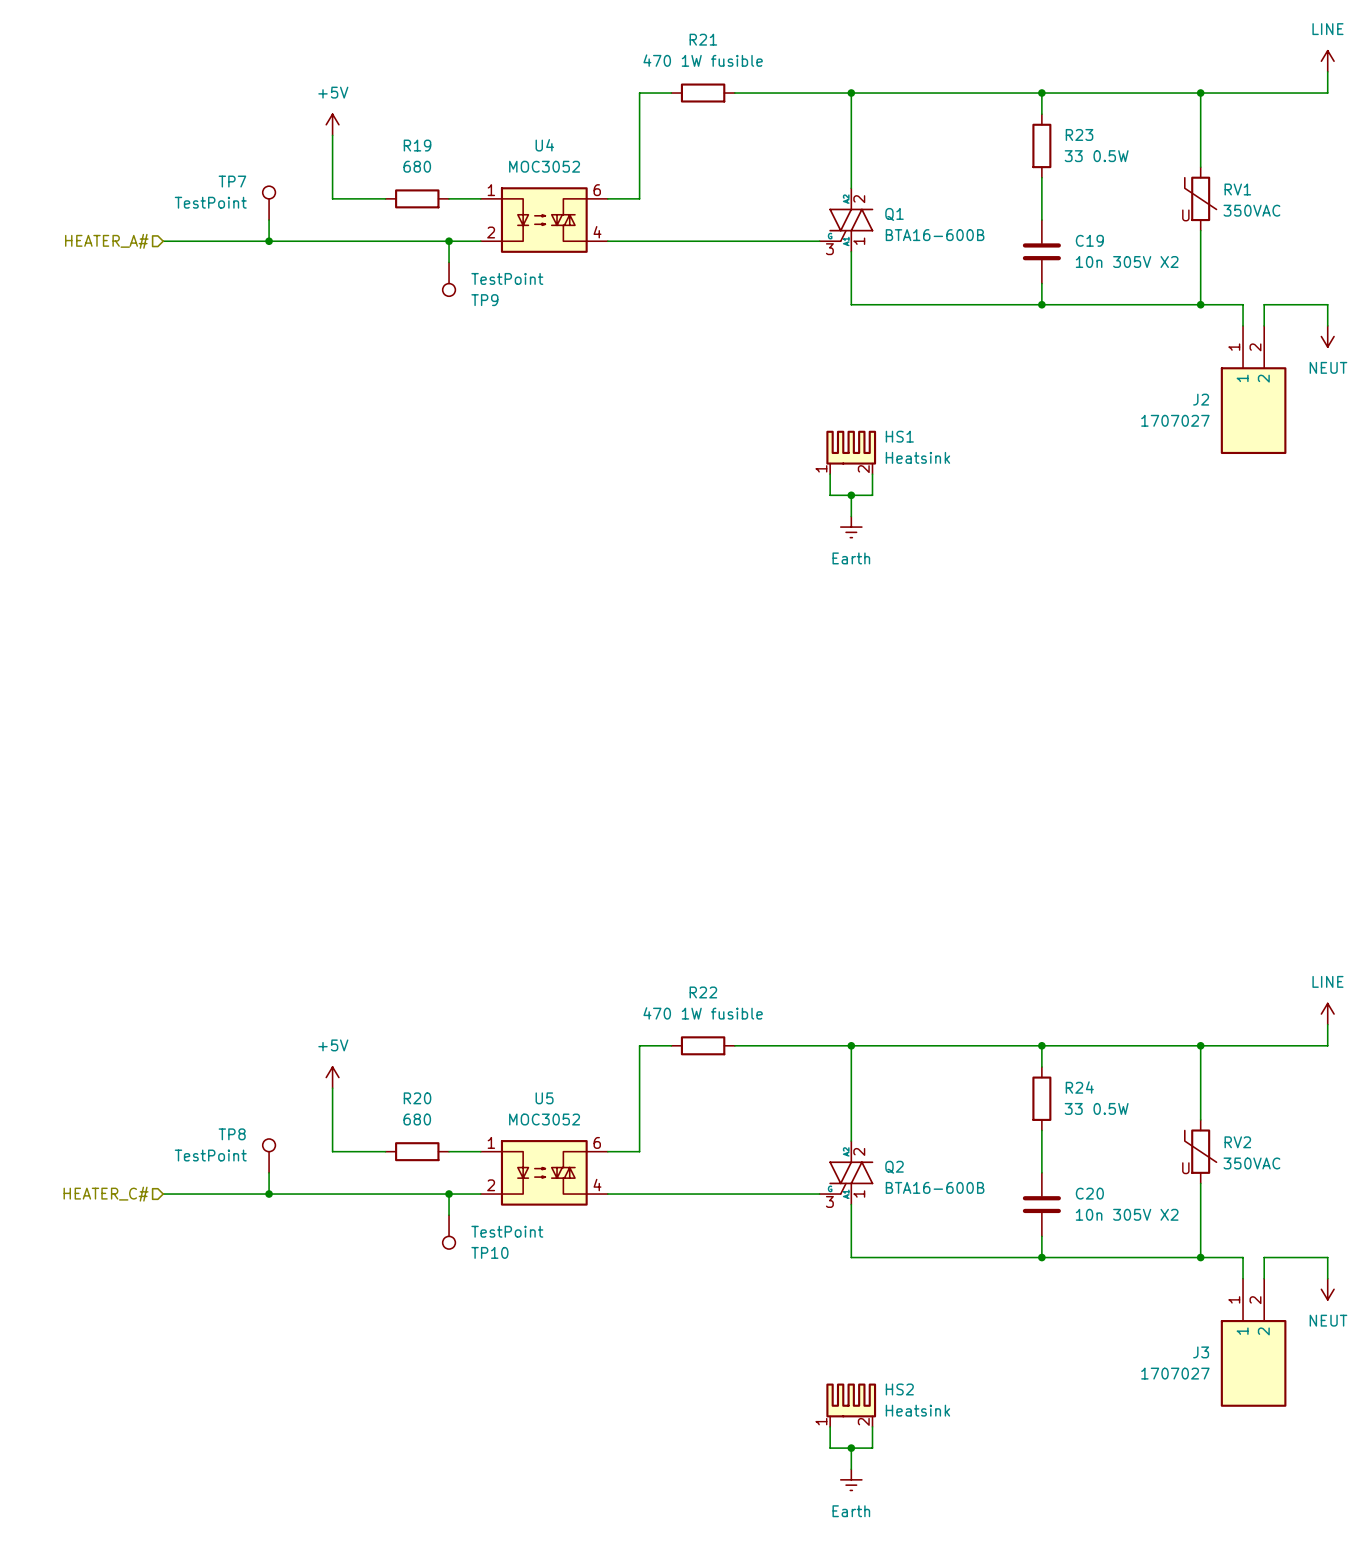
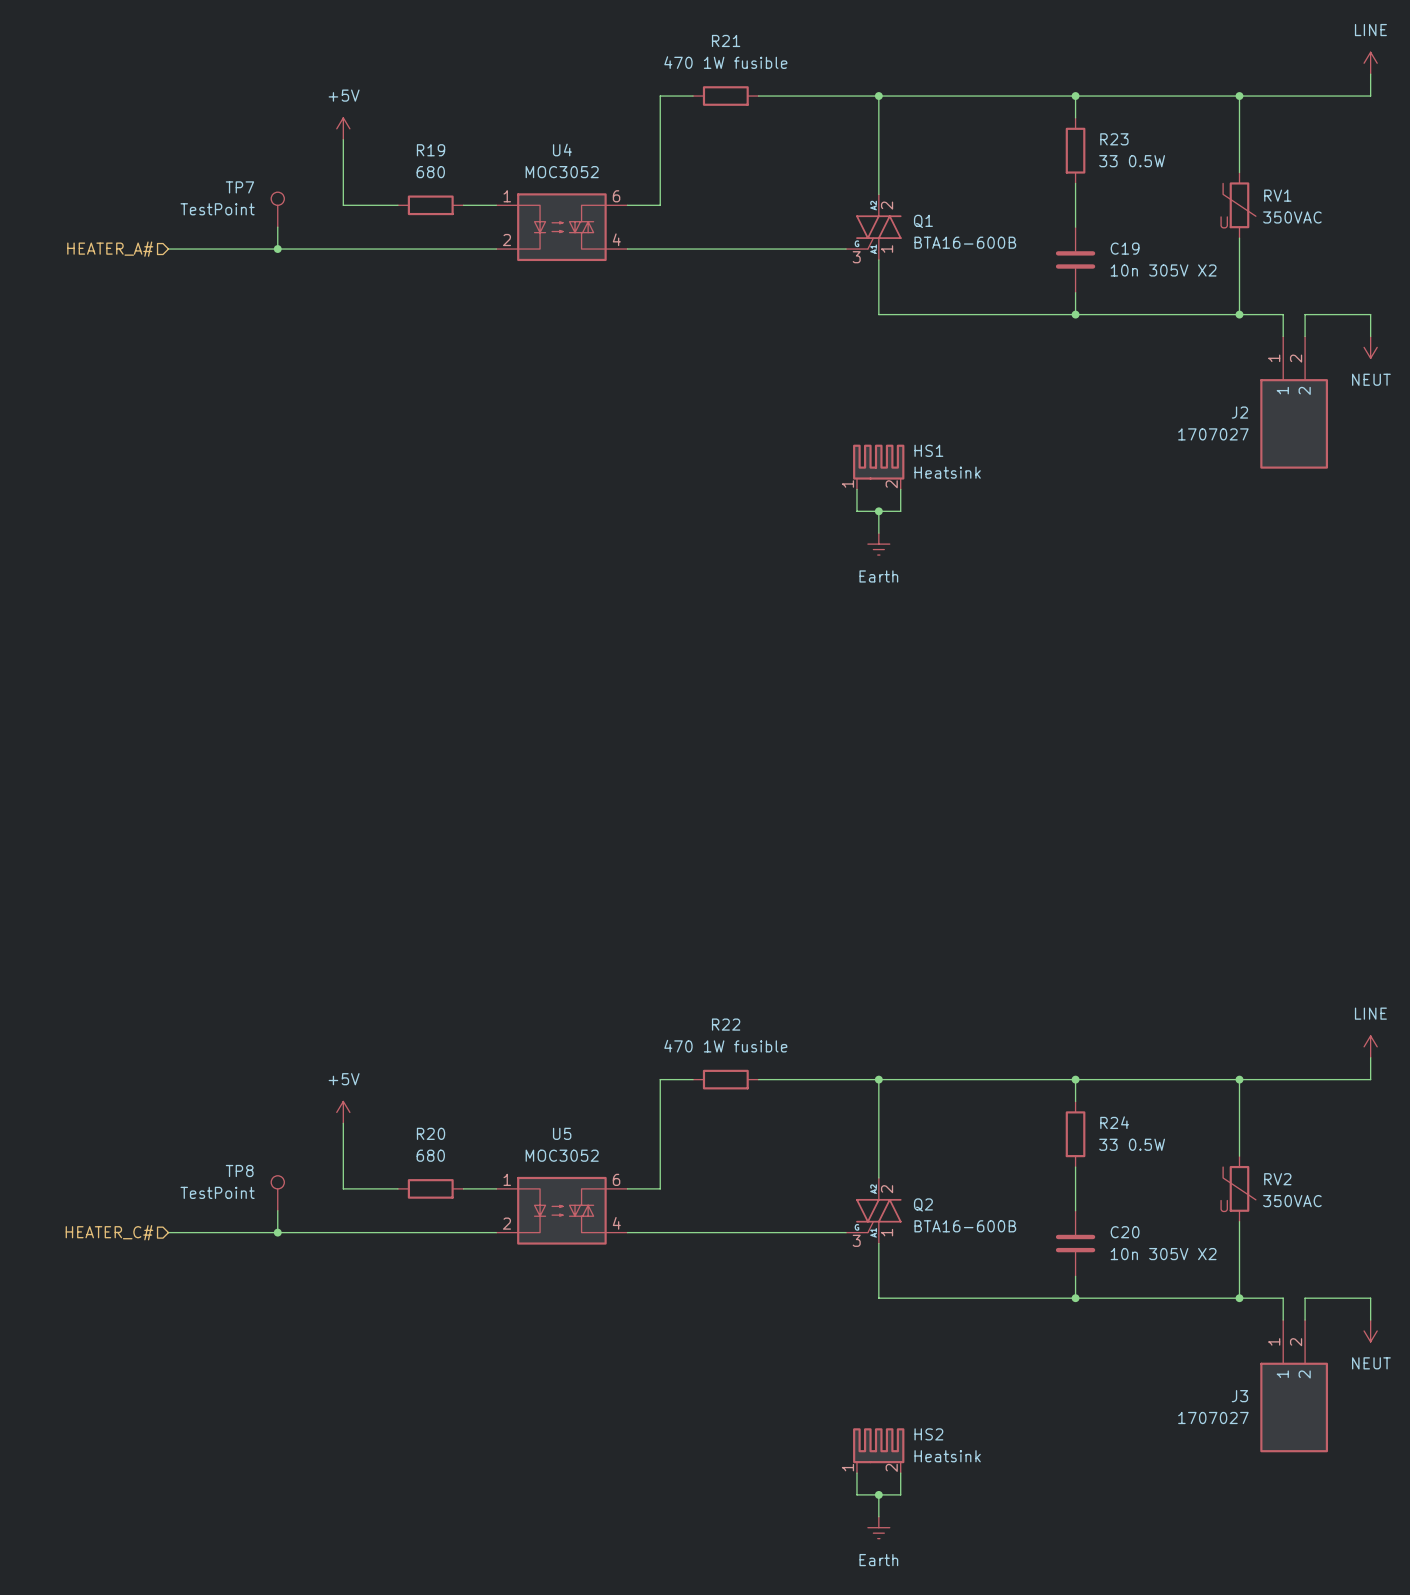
wire: (449, 241) (449, 262) -> none
junction: (449, 241) -> none
TP9: TestPoint (449, 279) -> none
wire: (449, 1194) (449, 1215) -> none
junction: (449, 1194) -> none
TP10: TestPoint (449, 1232) -> none

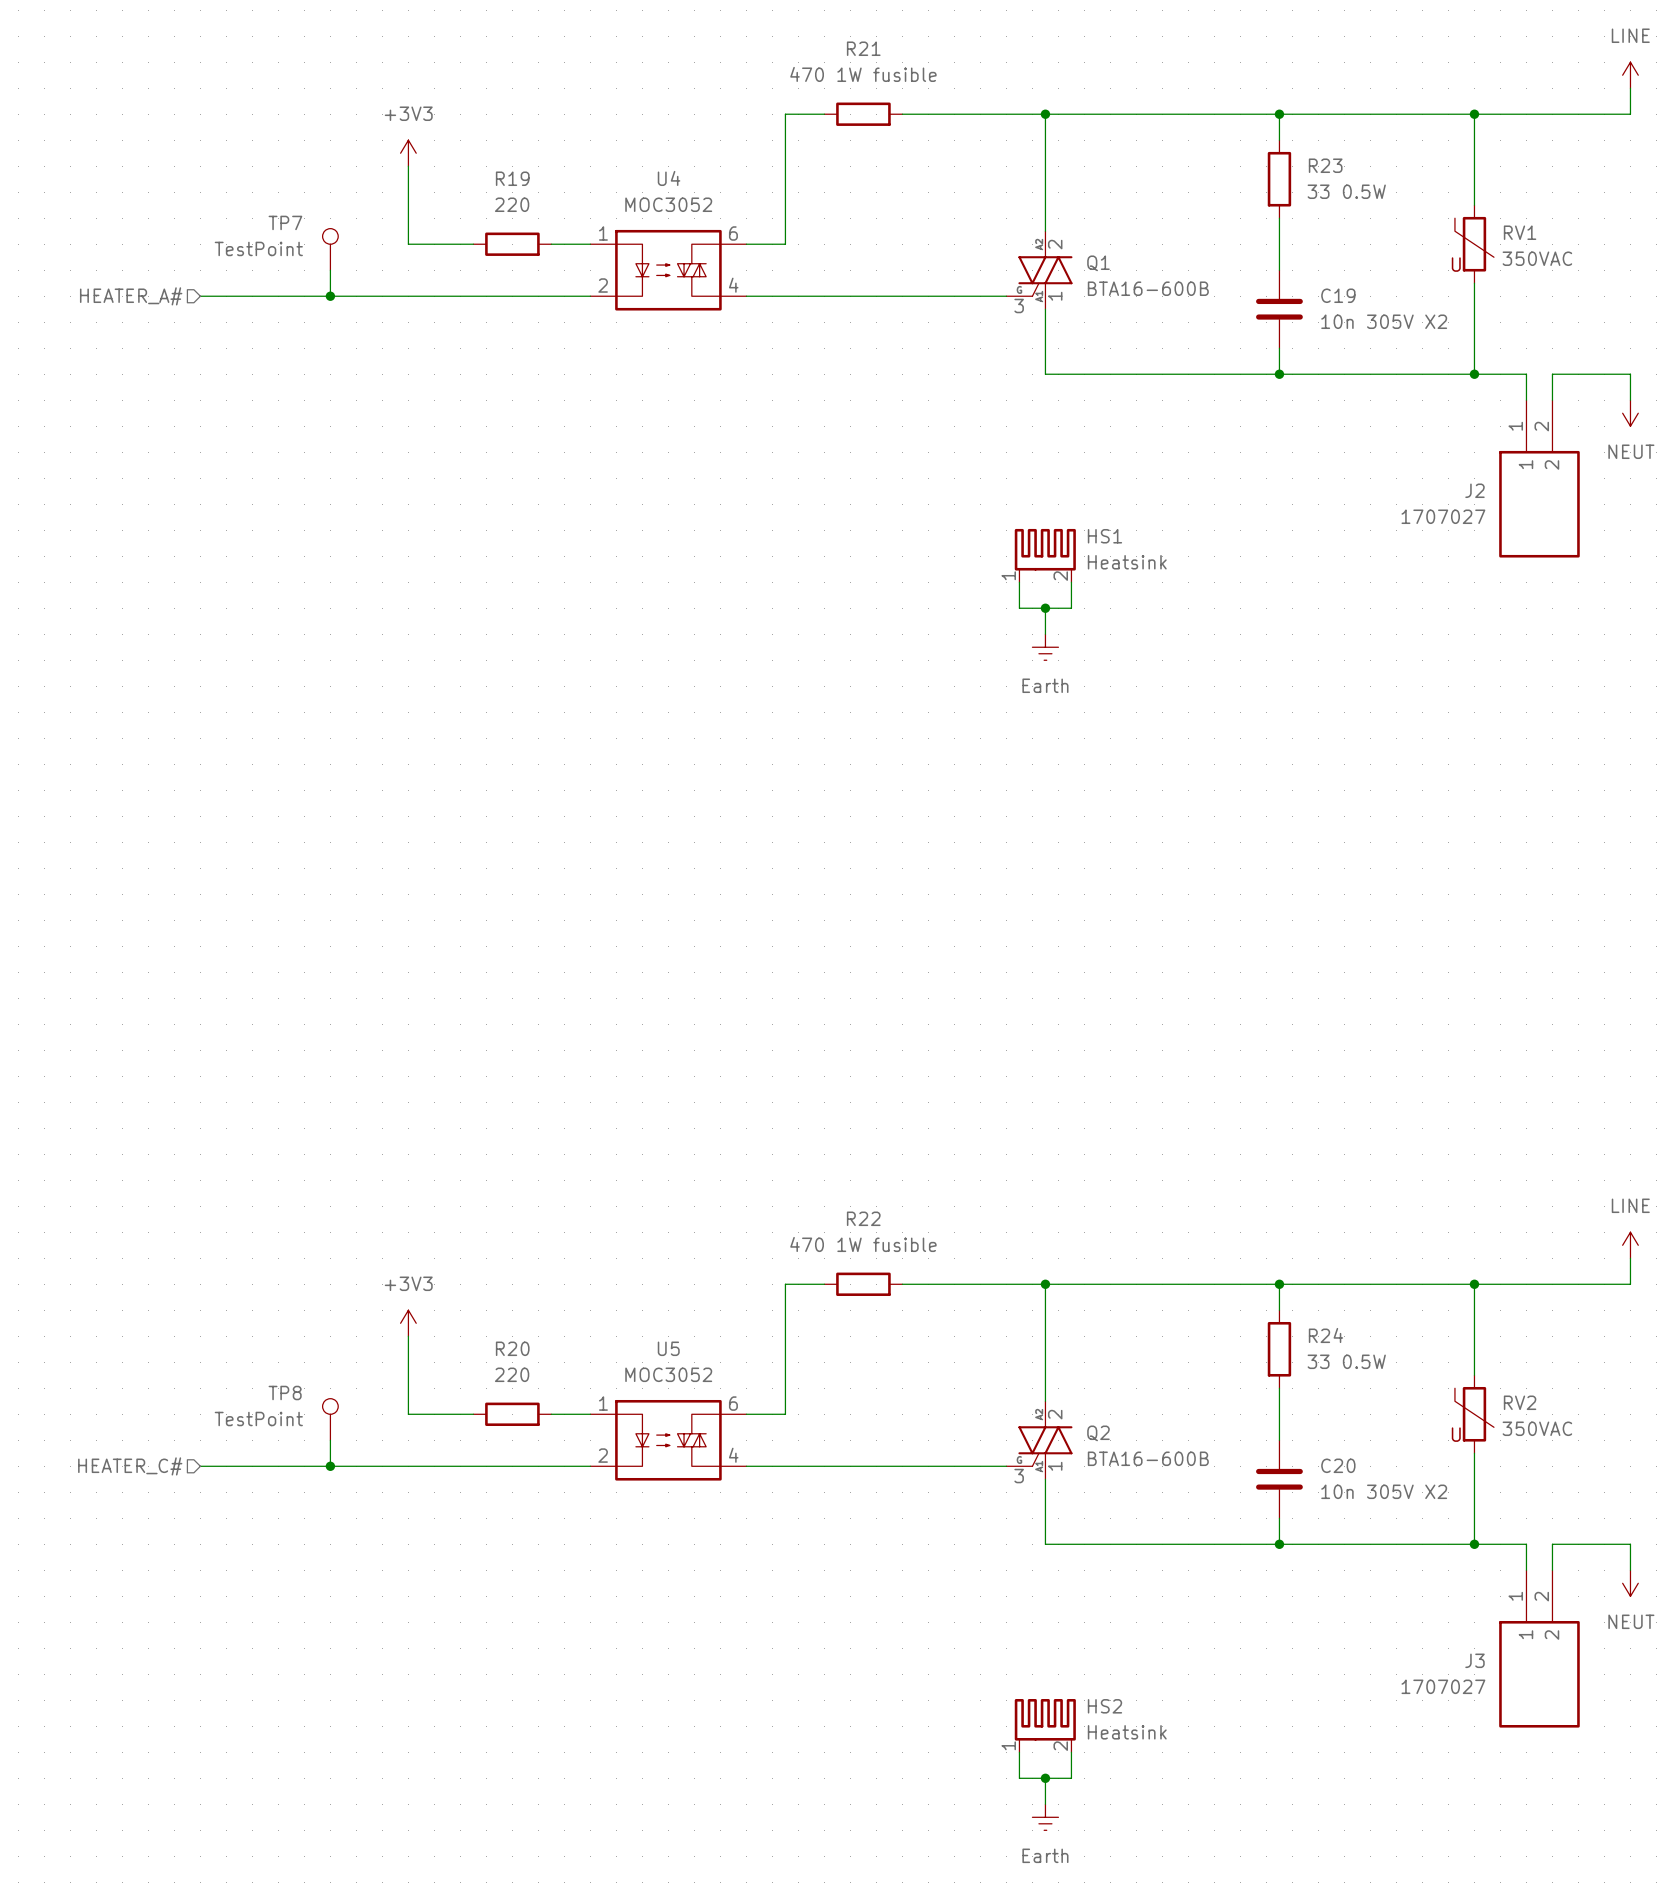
power symbol: +5V (343, 128) -> +3V3 (408, 153)
R19 value: 680 (430, 172) -> 220 (512, 204)
power symbol: +5V (343, 1112) -> +3V3 (408, 1323)
R20 value: 680 (430, 1155) -> 220 (512, 1374)

